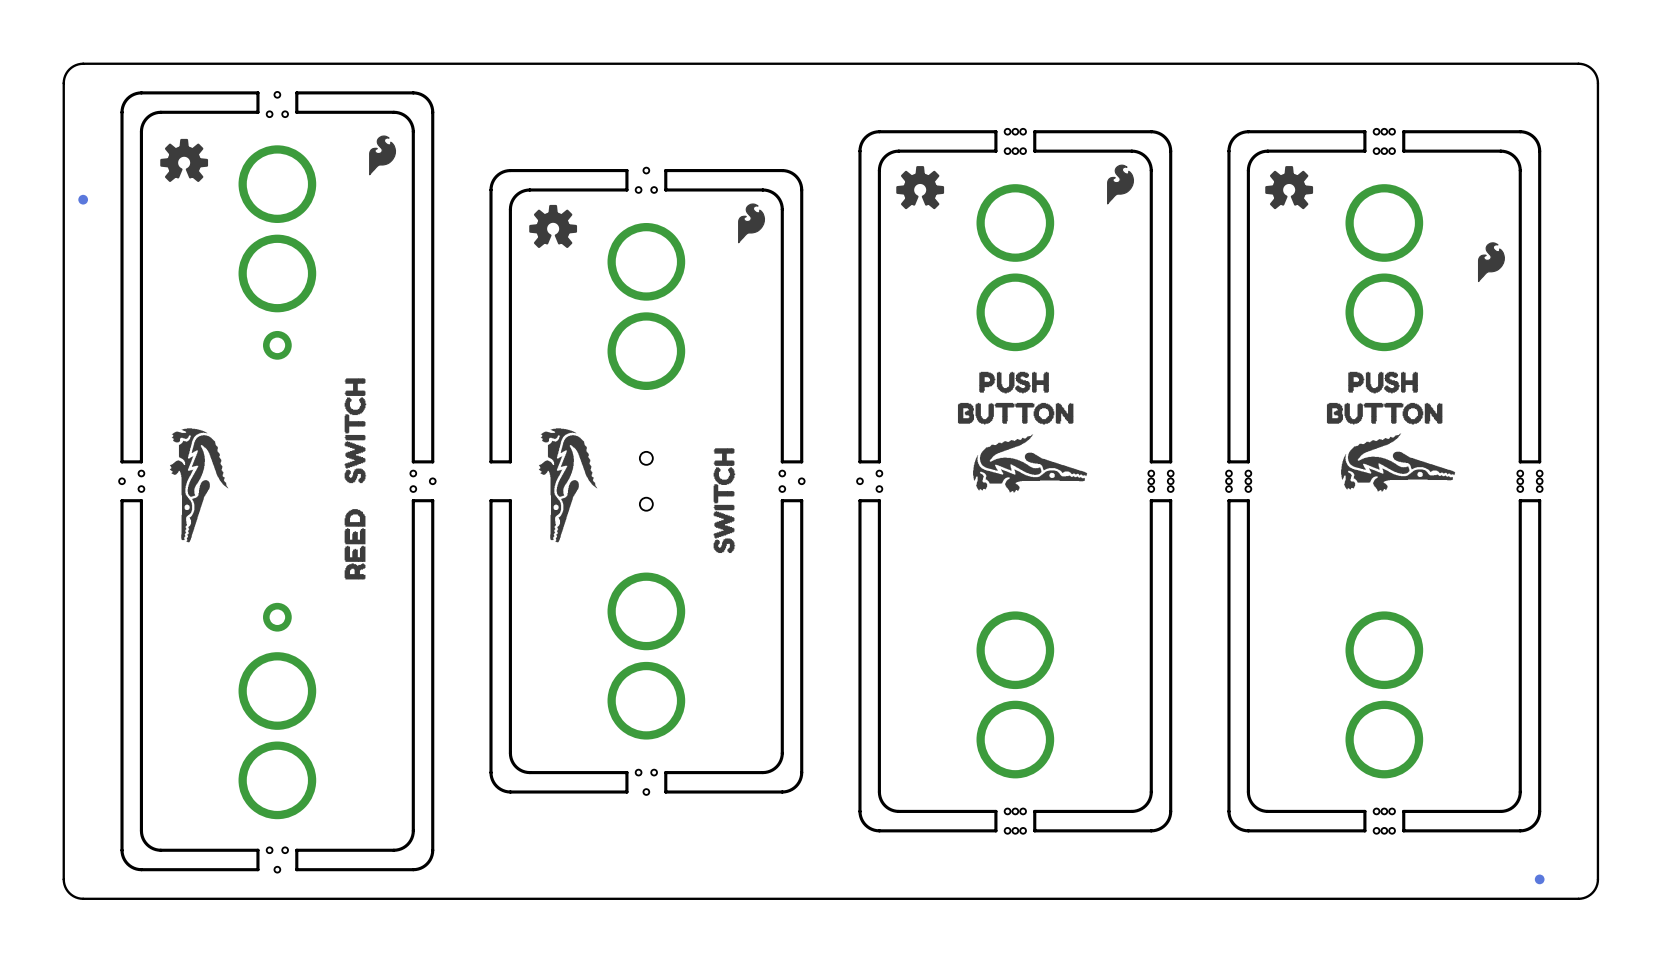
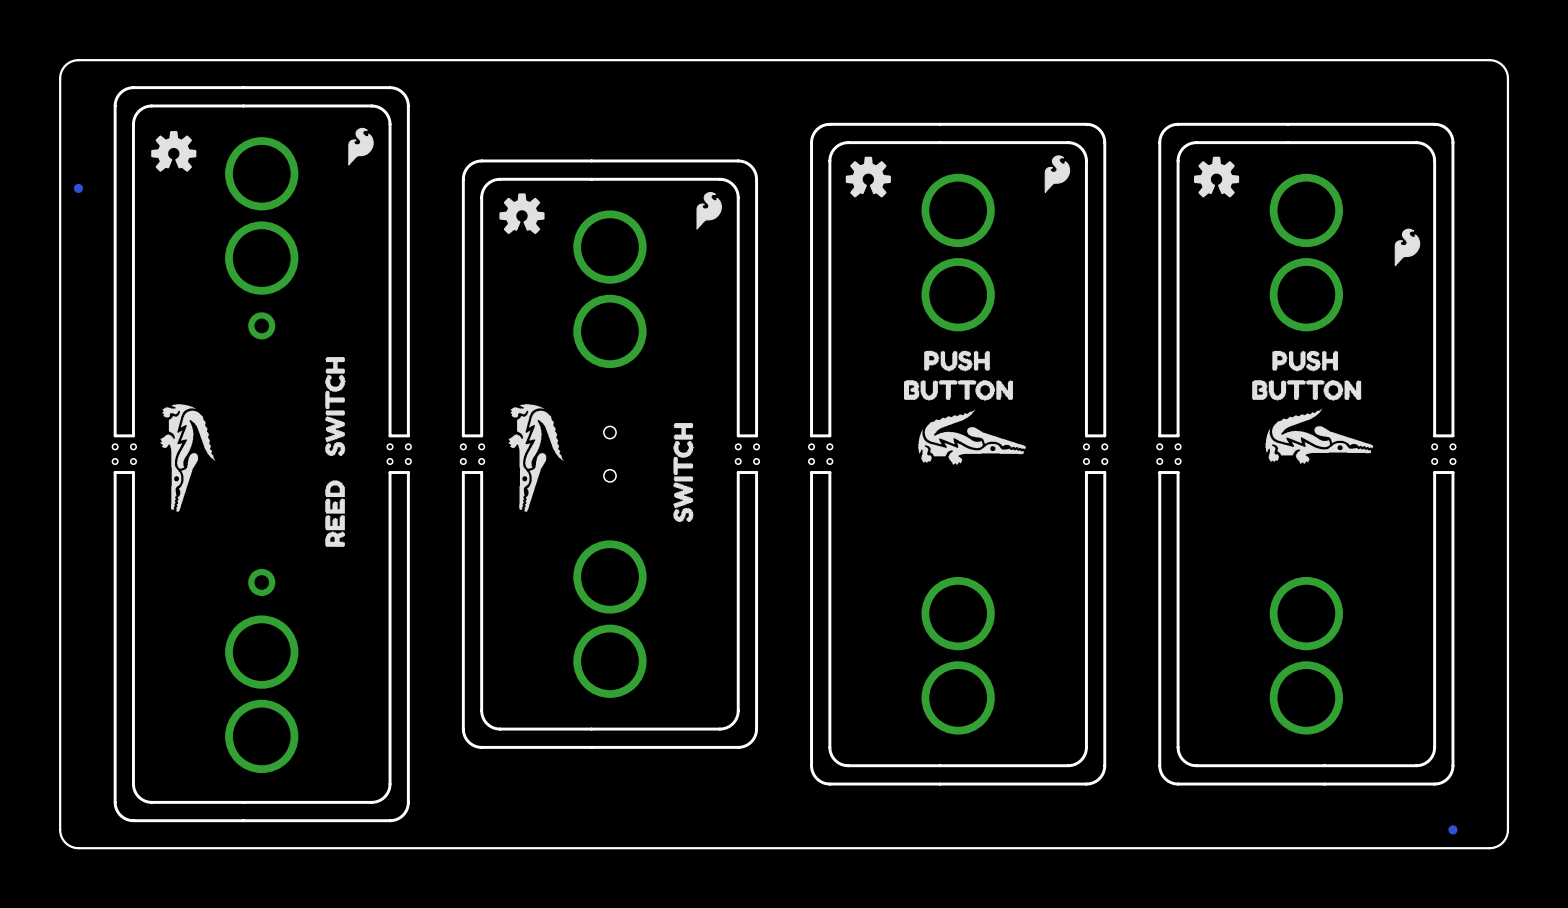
board edge: (257, 92) (257, 112) -> (280, 105) (243, 105)
board edge: (296, 92) (296, 112) -> (280, 87) (243, 87)
hole: (277, 94) -> none
hole: (269, 114) -> none
hole: (285, 114) -> none
board edge: (995, 131) (995, 151) -> (976, 142) (939, 142)
hole: (1007, 131) -> none
hole: (1015, 131) -> none
hole: (1023, 131) -> none
board edge: (1034, 131) (1034, 151) -> (976, 124) (939, 124)
board edge: (1364, 131) (1364, 151) -> (1324, 142) (1288, 142)
hole: (1376, 131) -> none
hole: (1384, 131) -> none
hole: (1392, 131) -> none
board edge: (1403, 131) (1403, 151) -> (1324, 124) (1288, 124)
hole: (1007, 151) -> none
hole: (1015, 151) -> none
hole: (1023, 151) -> none
hole: (1376, 151) -> none
hole: (1384, 151) -> none
hole: (1392, 151) -> none
board edge: (626, 170) (626, 189) -> (628, 179) (591, 179)
hole: (646, 170) -> none
board edge: (665, 170) (665, 189) -> (628, 160) (591, 160)
hole: (638, 189) -> none
hole: (654, 189) -> none
hole: none -> (115, 446)
hole: none -> (408, 446)
hole: none -> (463, 446)
hole: none -> (481, 446)
hole: none -> (756, 446)
hole: none -> (811, 446)
hole: (122, 481) -> none
hole: (432, 481) -> none
hole: (801, 481) -> none
hole: (859, 481) -> none
hole: (1151, 481) -> none
hole: (1170, 481) -> none
hole: (1228, 481) -> none
hole: (1248, 481) -> none
hole: (1520, 481) -> none
hole: (1539, 481) -> none
hole: none -> (115, 461)
hole: none -> (408, 461)
hole: none -> (463, 461)
hole: none -> (481, 461)
hole: none -> (756, 461)
hole: none -> (811, 461)
board edge: (626, 772) (626, 792) -> (628, 747) (591, 747)
hole: (638, 772) -> none
hole: (654, 772) -> none
board edge: (665, 772) (665, 792) -> (628, 729) (591, 729)
hole: (646, 792) -> none
board edge: (995, 811) (995, 830) -> (976, 784) (939, 784)
hole: (1007, 811) -> none
hole: (1015, 811) -> none
hole: (1023, 811) -> none
board edge: (1034, 811) (1034, 830) -> (976, 765) (939, 765)
board edge: (1364, 811) (1364, 830) -> (1324, 784) (1288, 784)
hole: (1376, 811) -> none
hole: (1384, 811) -> none
hole: (1392, 811) -> none
board edge: (1403, 811) (1403, 830) -> (1324, 765) (1288, 765)
hole: (1007, 830) -> none
hole: (1015, 830) -> none
hole: (1023, 830) -> none
hole: (1376, 830) -> none
hole: (1384, 830) -> none
hole: (1392, 830) -> none
board edge: (257, 850) (257, 869) -> (280, 820) (243, 820)
hole: (269, 850) -> none
hole: (285, 850) -> none
board edge: (296, 850) (296, 869) -> (280, 802) (243, 802)
hole: (277, 869) -> none

